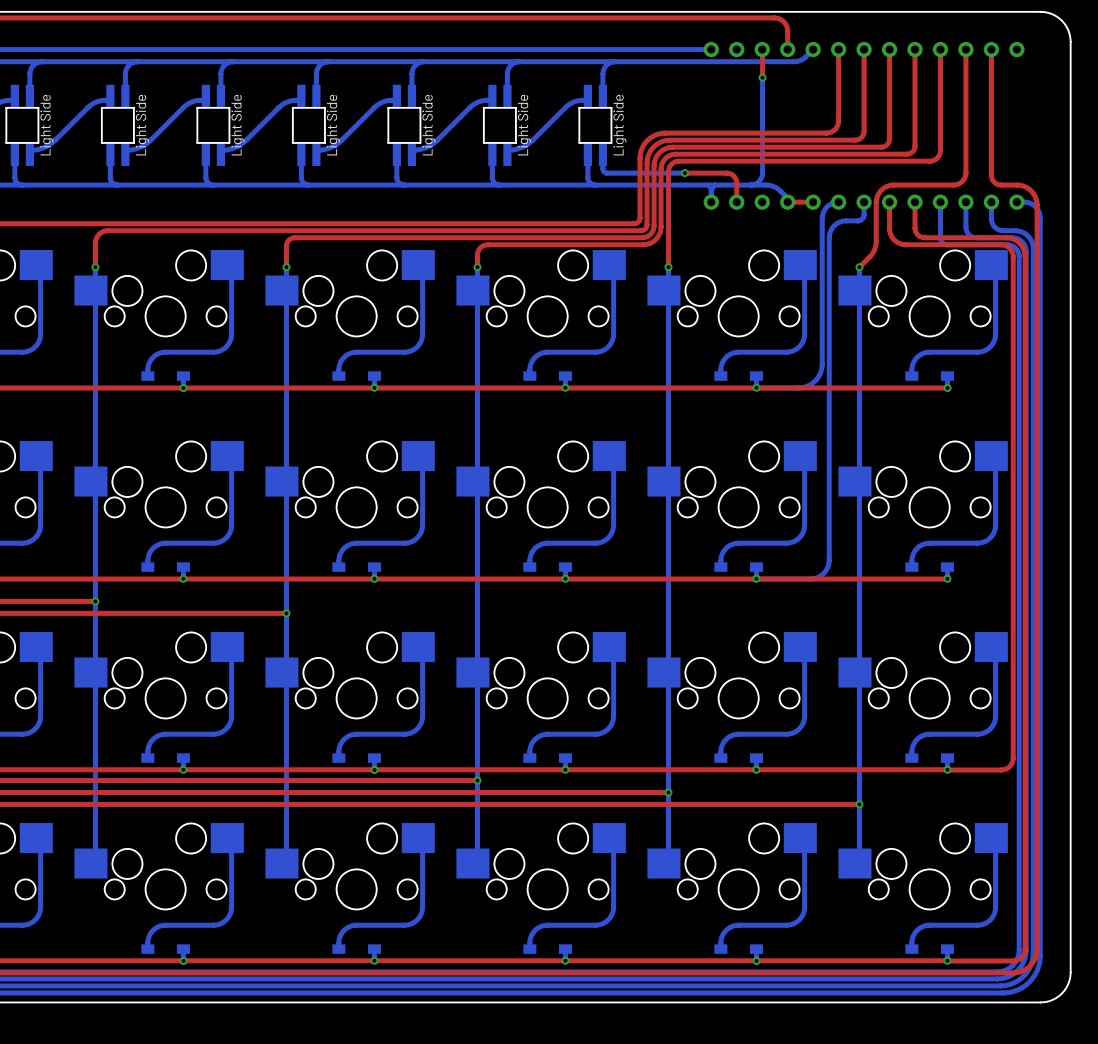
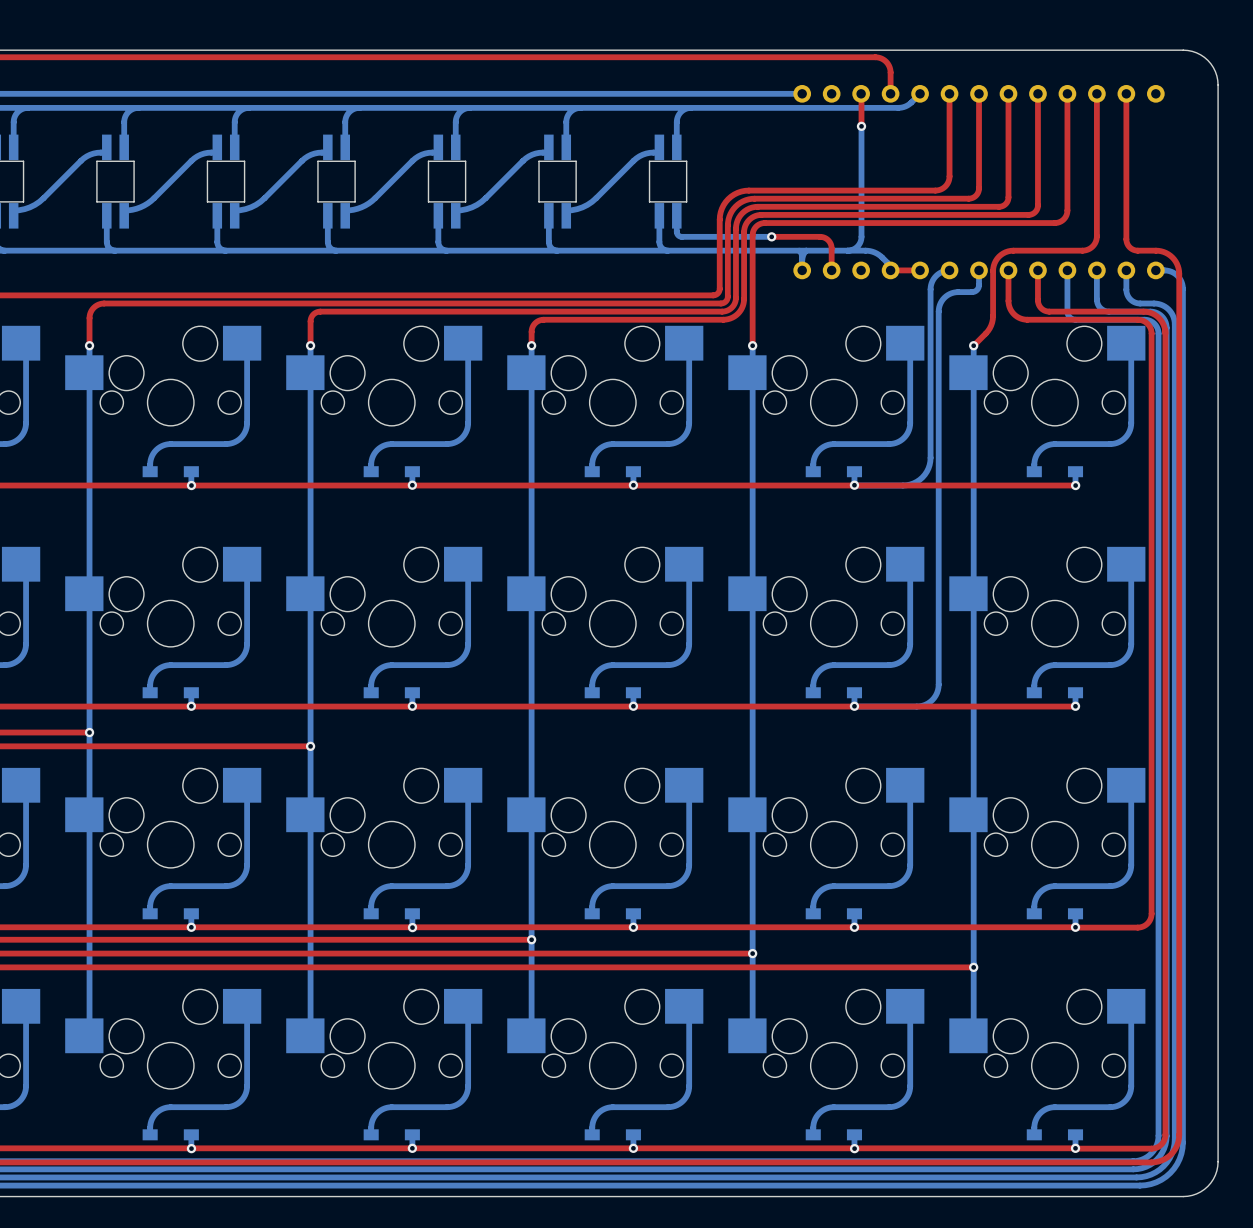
part text: Light Side (46, 125) -> none
part text: Light Side (142, 125) -> none
part text: Light Side (237, 125) -> none
part text: Light Side (333, 125) -> none
part text: Light Side (428, 125) -> none
part text: Light Side (524, 125) -> none
part text: Light Side (619, 125) -> none

